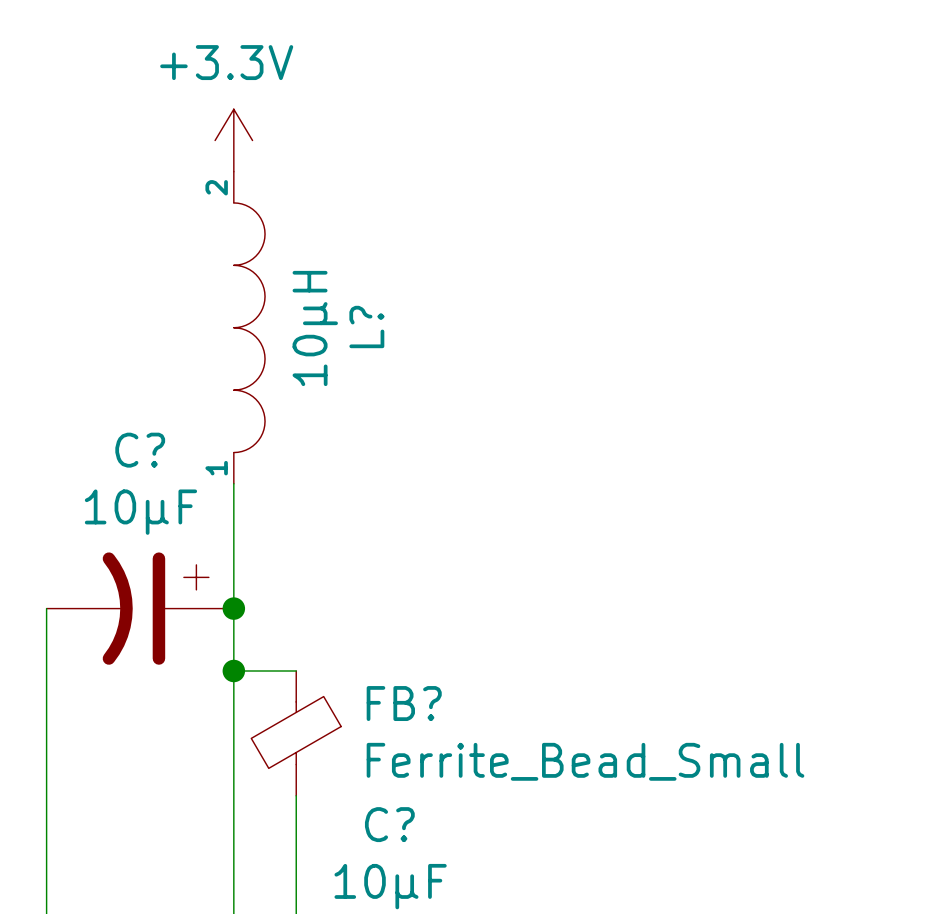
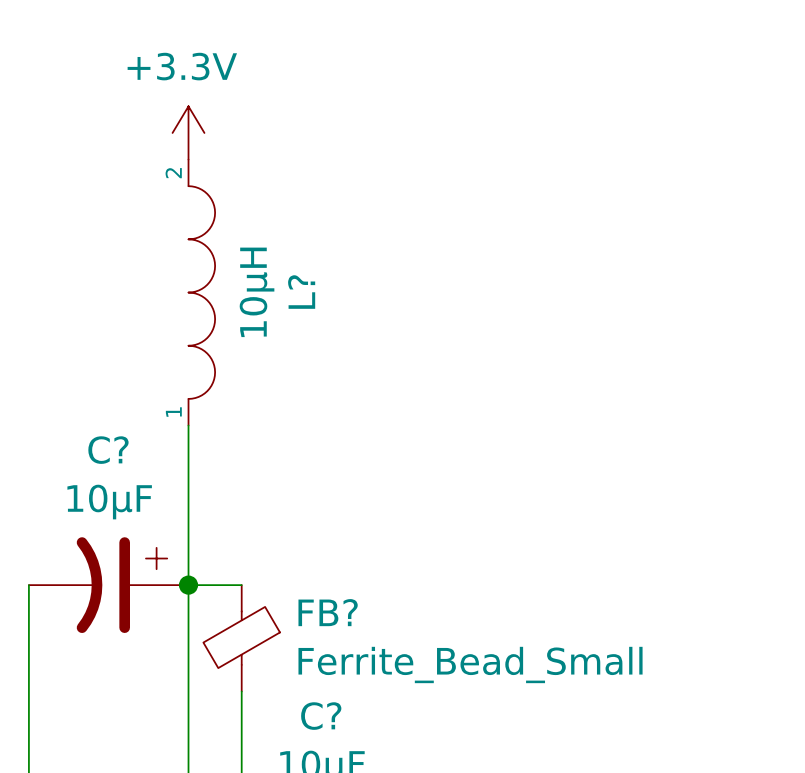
wire: (46, 608) (46, 671) -> none
C? position: (140, 608) -> (108, 585)
junction: (233, 608) -> none

